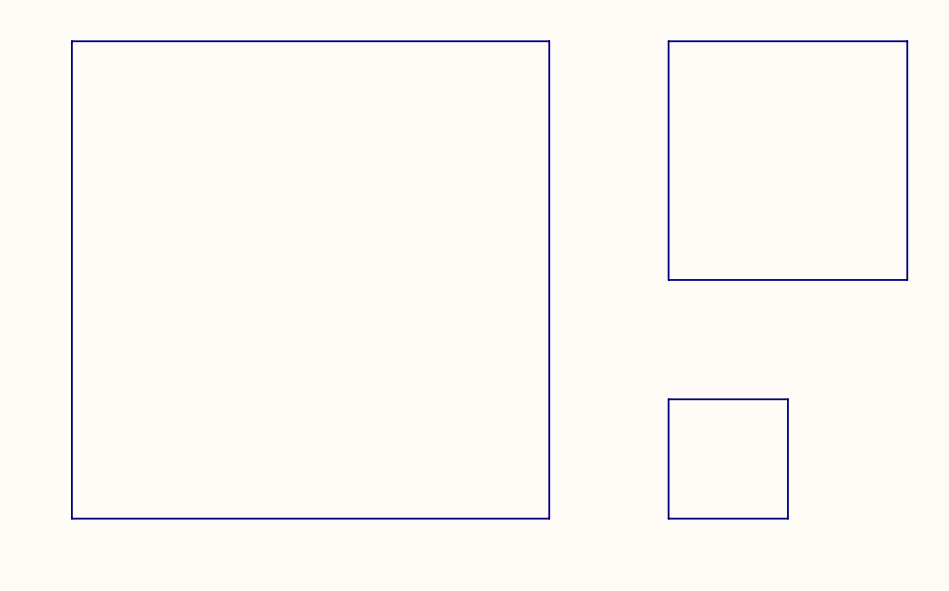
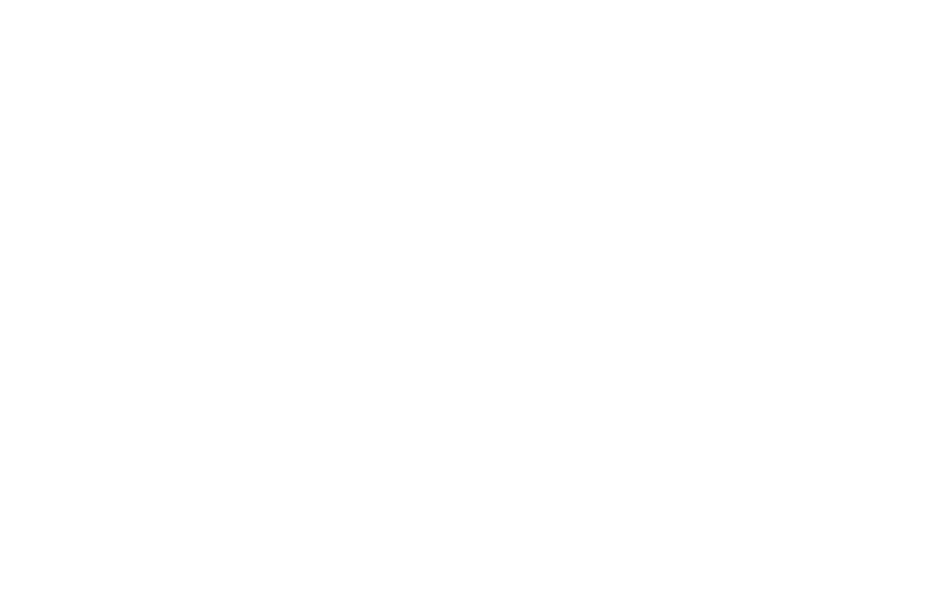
line: (71, 41) (549, 41) (549, 518) (71, 518) (71, 41) -> none
line: (668, 41) (907, 41) (907, 279) (668, 279) (668, 41) -> none
line: (668, 399) (668, 518) (787, 518) (787, 399) (668, 399) -> none

